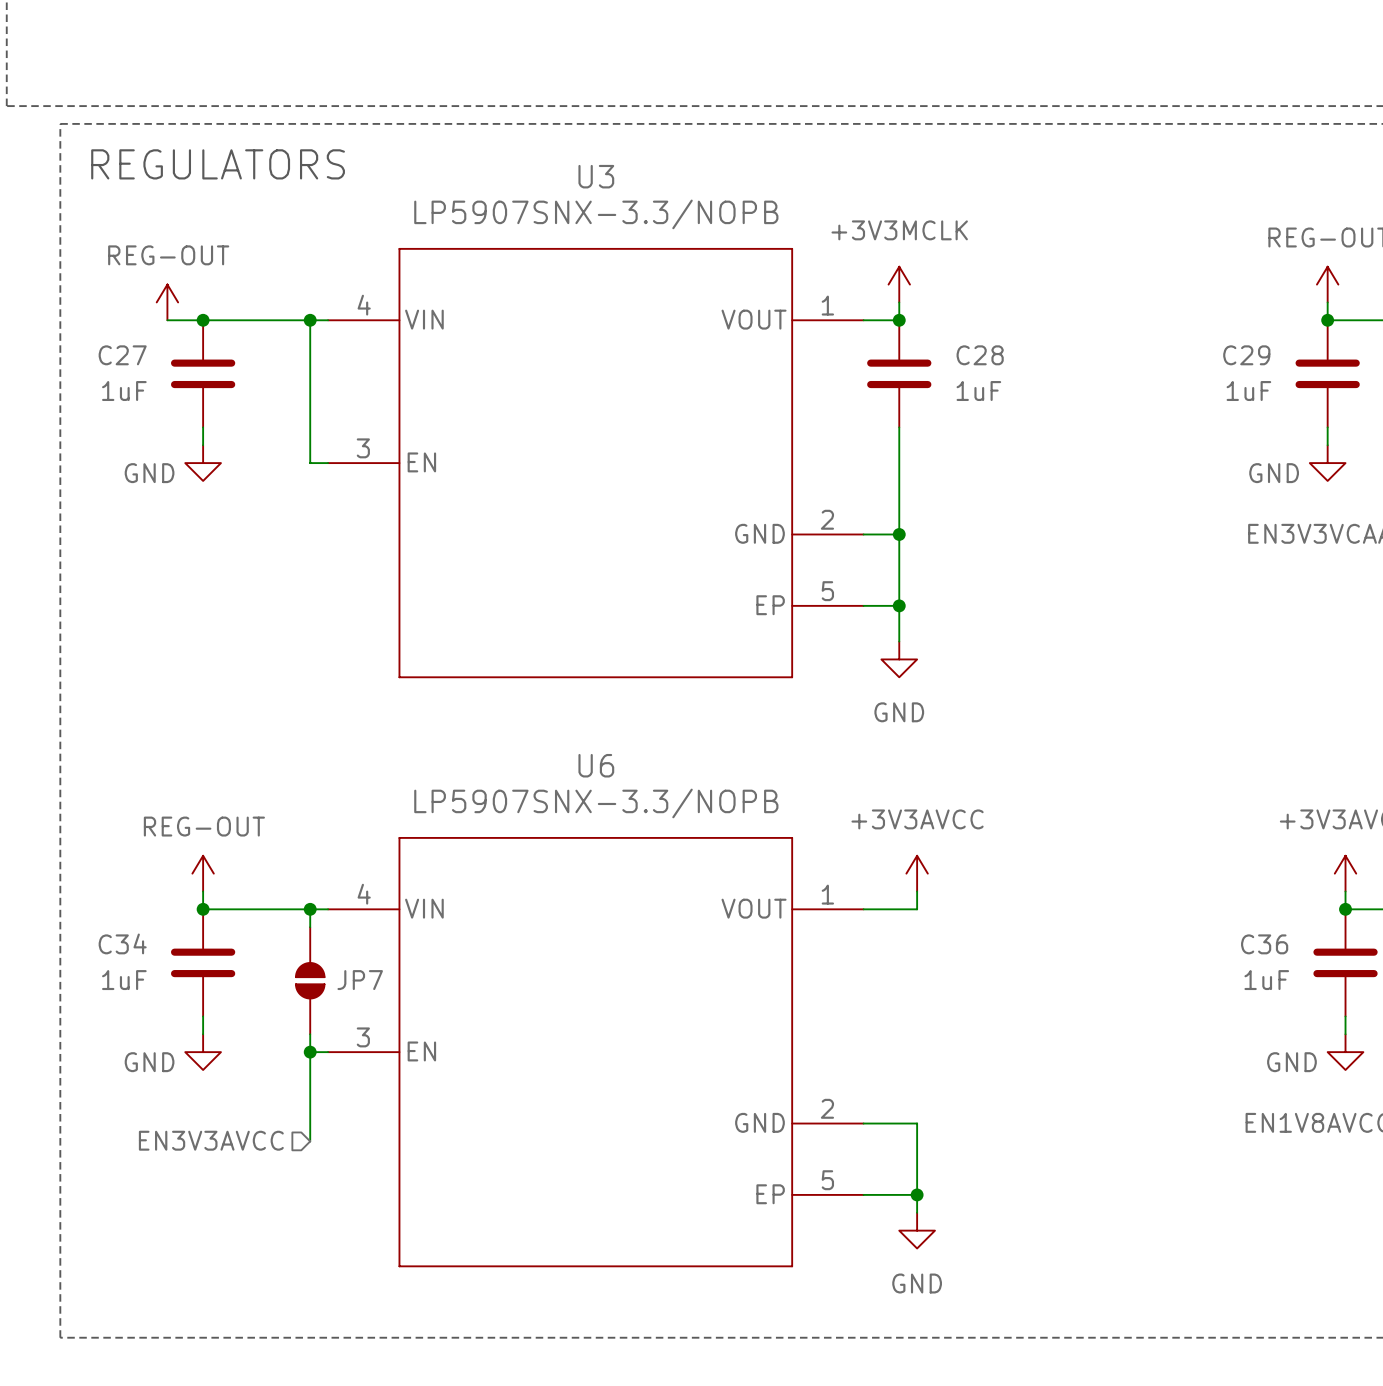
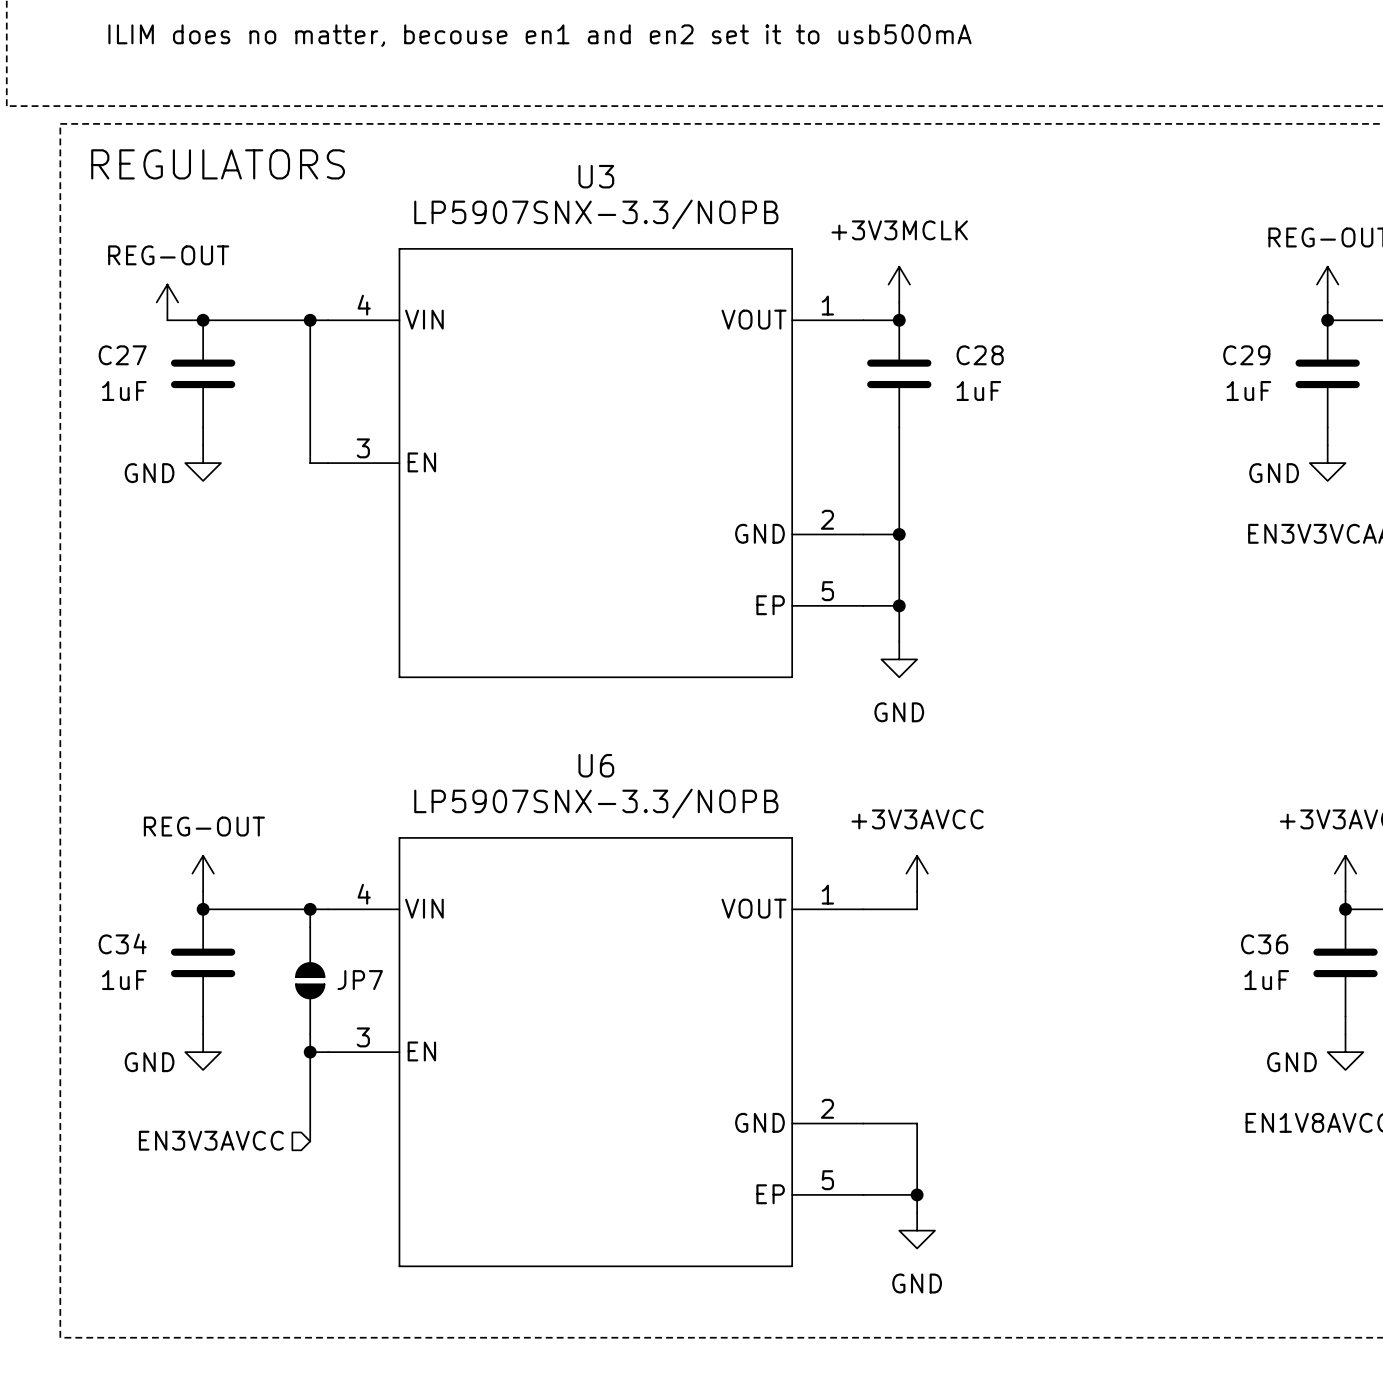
text: none -> ILIM does no matter, becouse en1 and en2 set it to usb500mA (539, 35)

